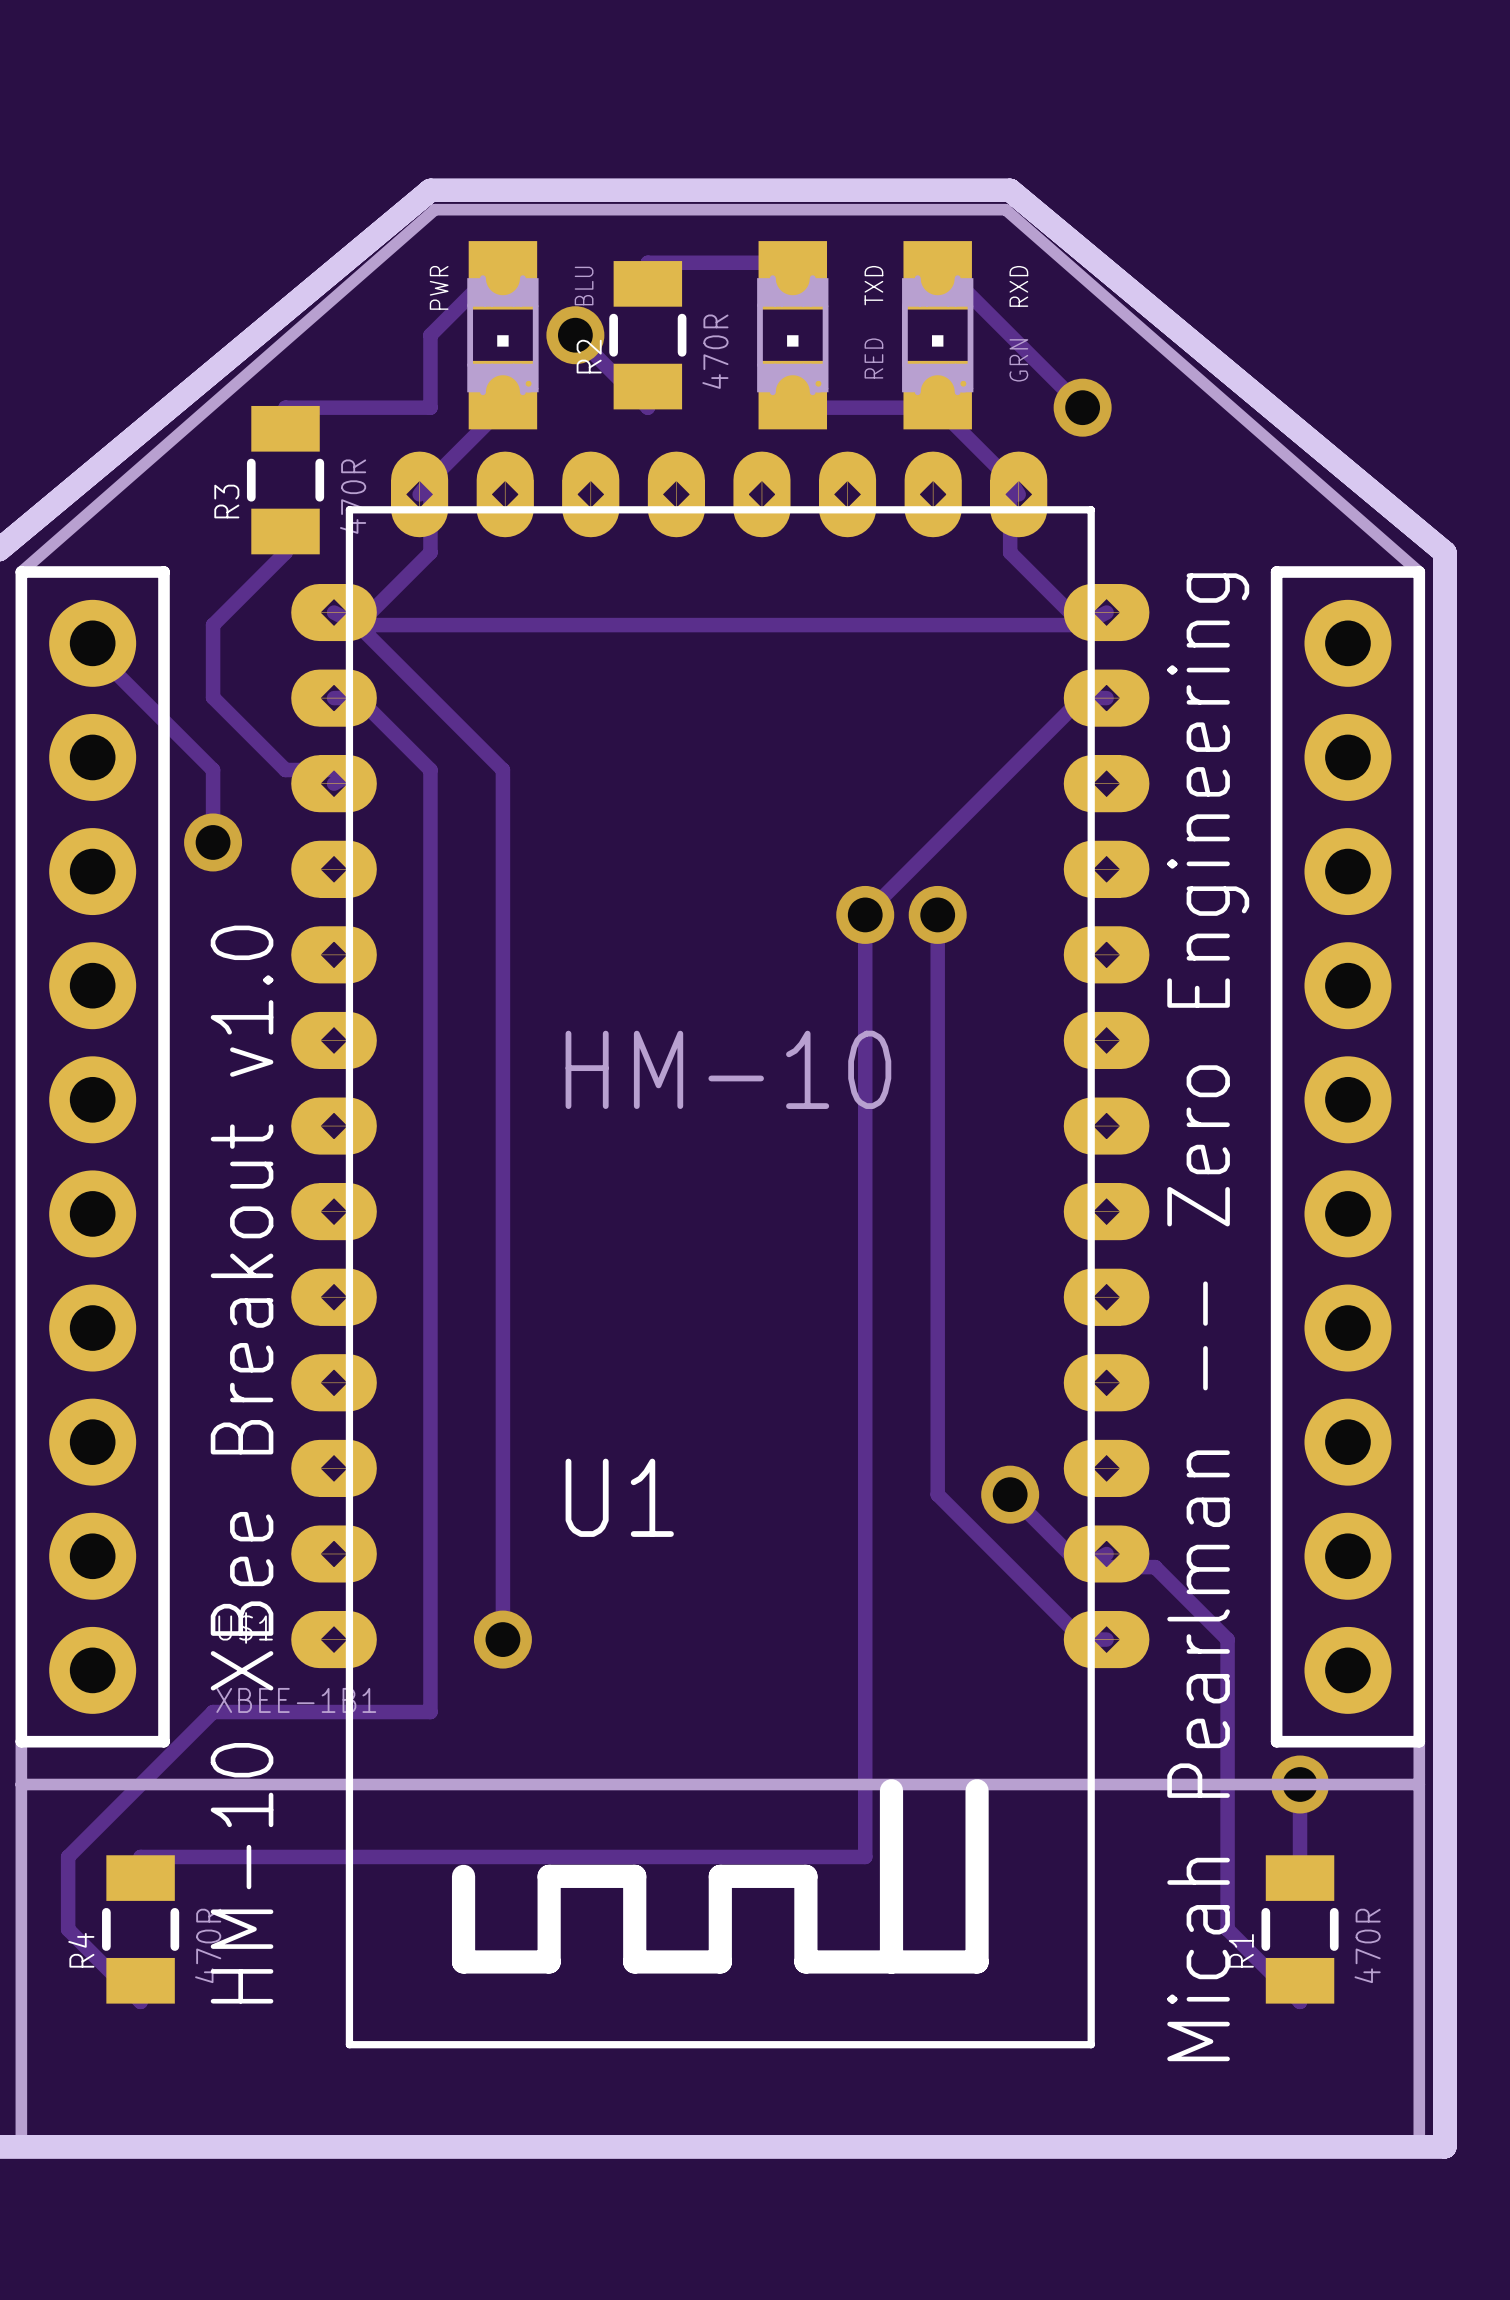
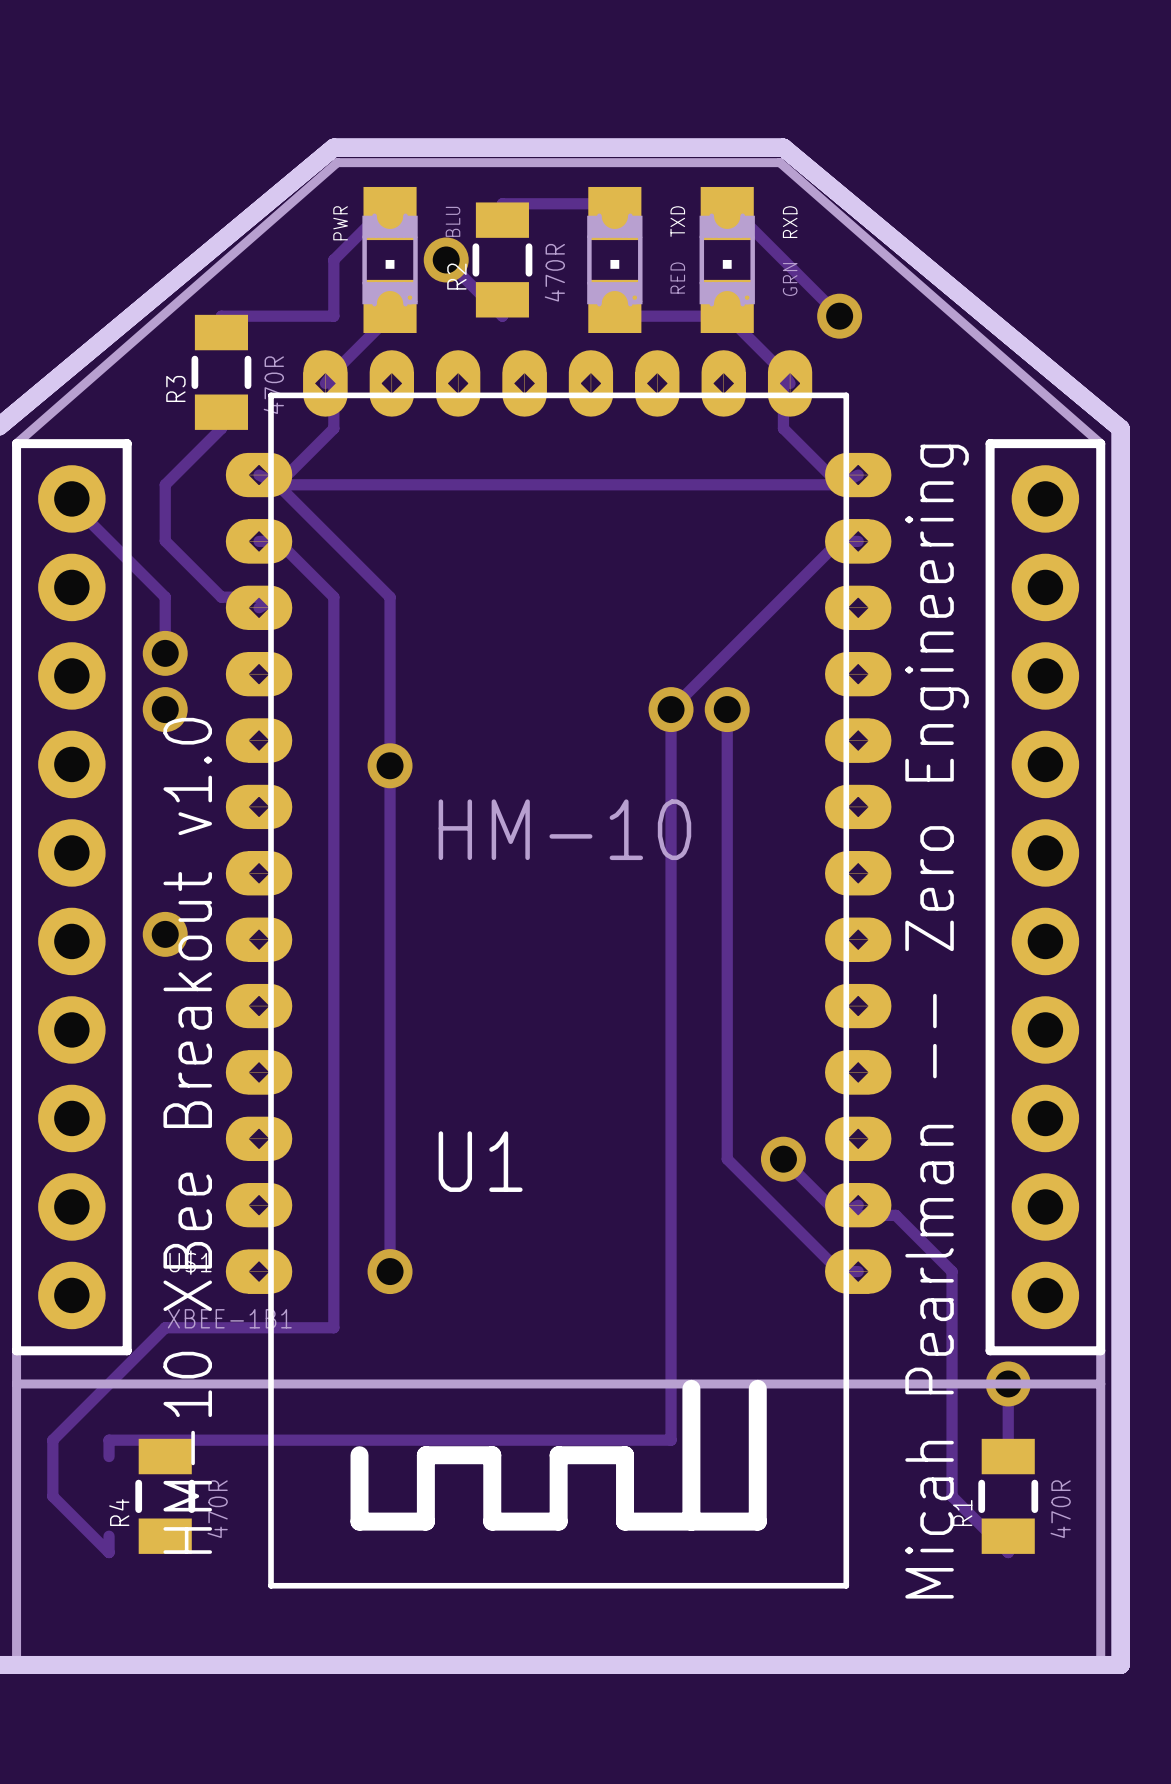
via: none -> (165, 709)
via: none -> (390, 765)
via: none -> (165, 934)
R4 position: (140, 1929) -> (165, 1496)

